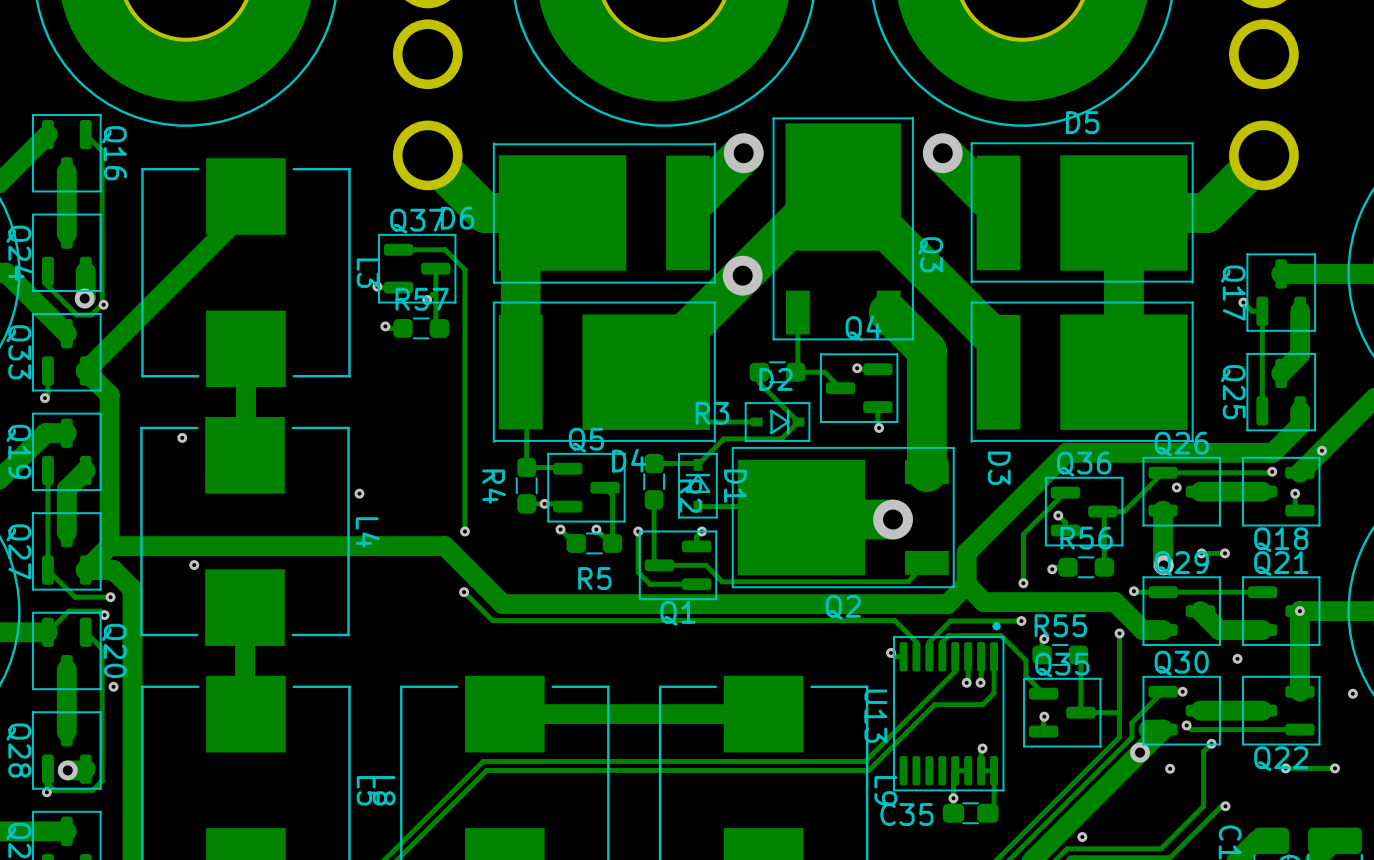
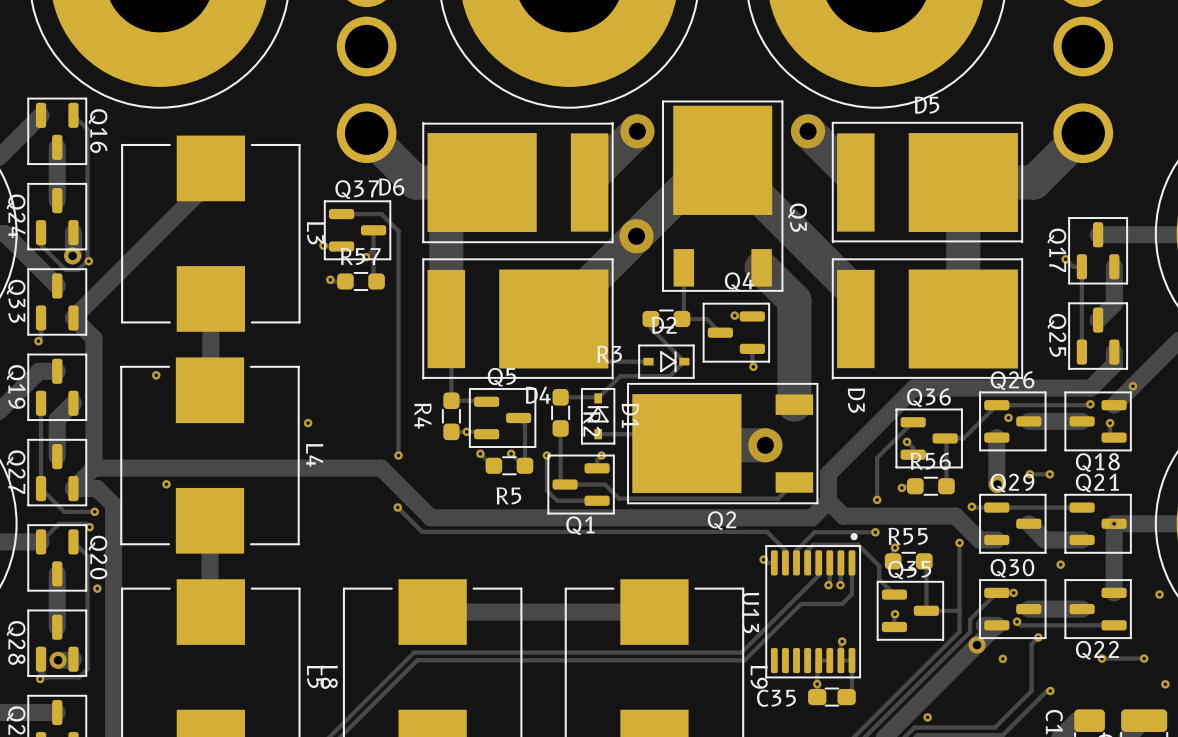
via: none -> (1165, 684)

